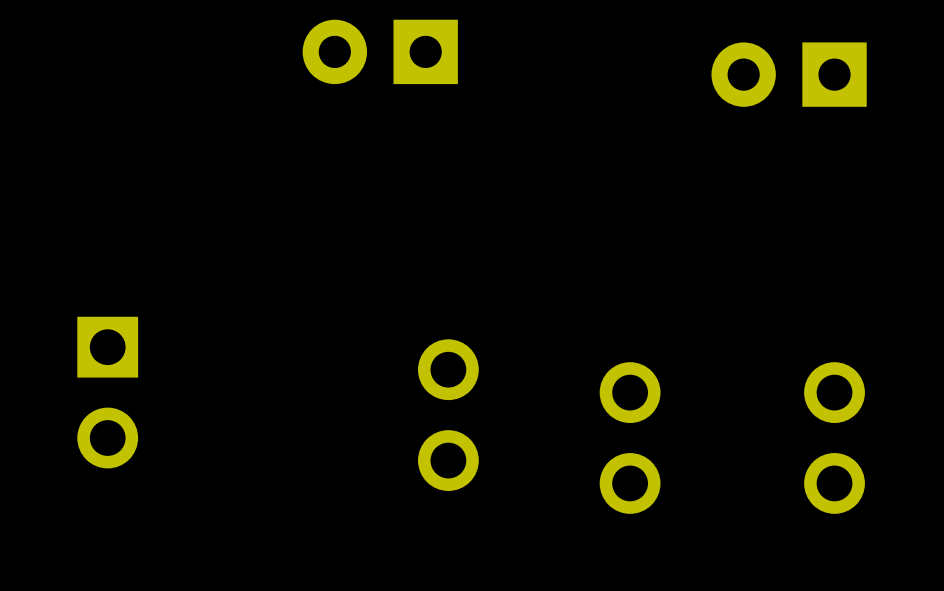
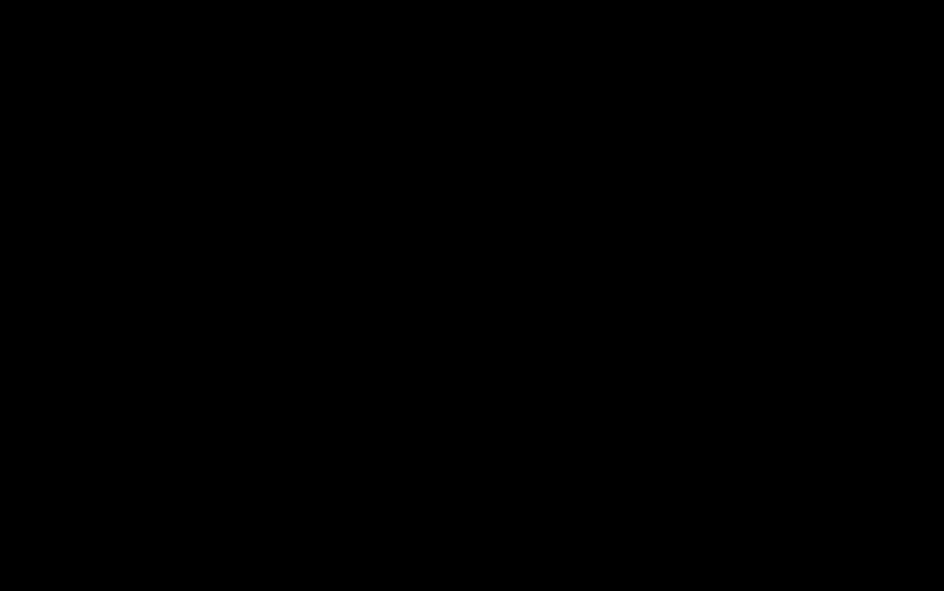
part: (380, 51) -> none
part: (789, 74) -> none
part: (107, 392) -> none
part: (448, 415) -> none
part: (630, 438) -> none
part: (834, 438) -> none

